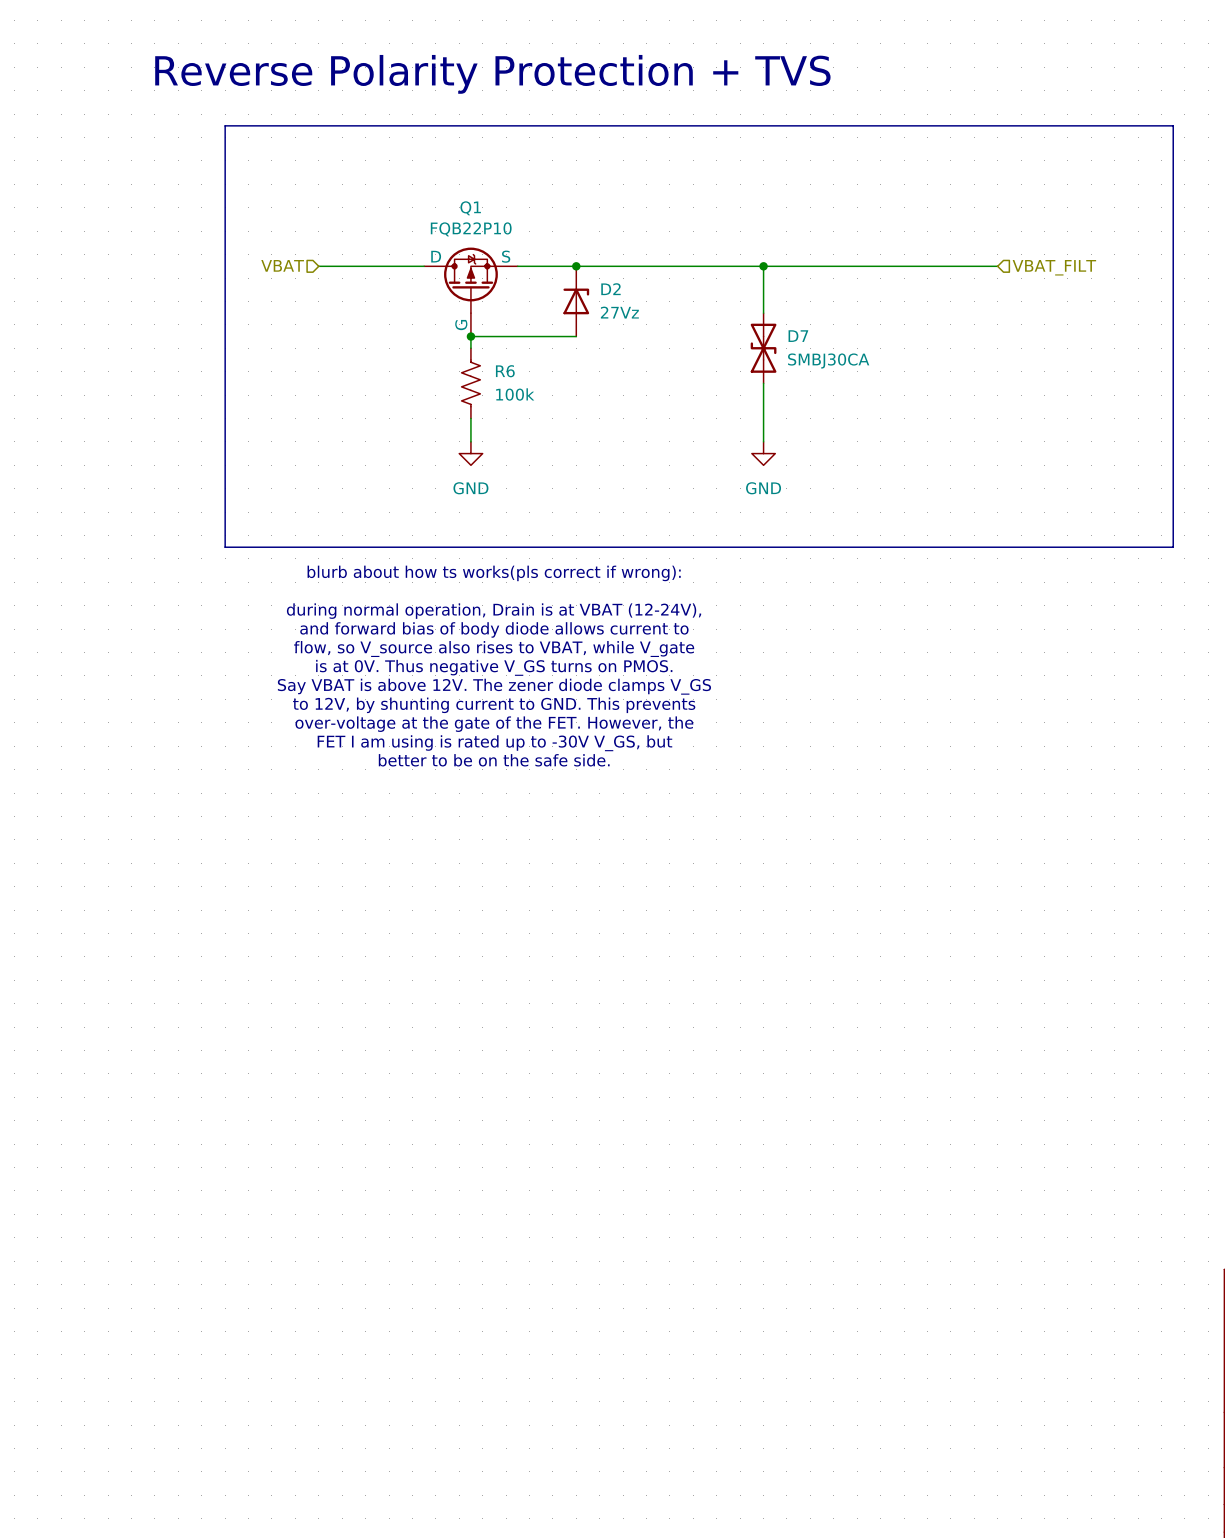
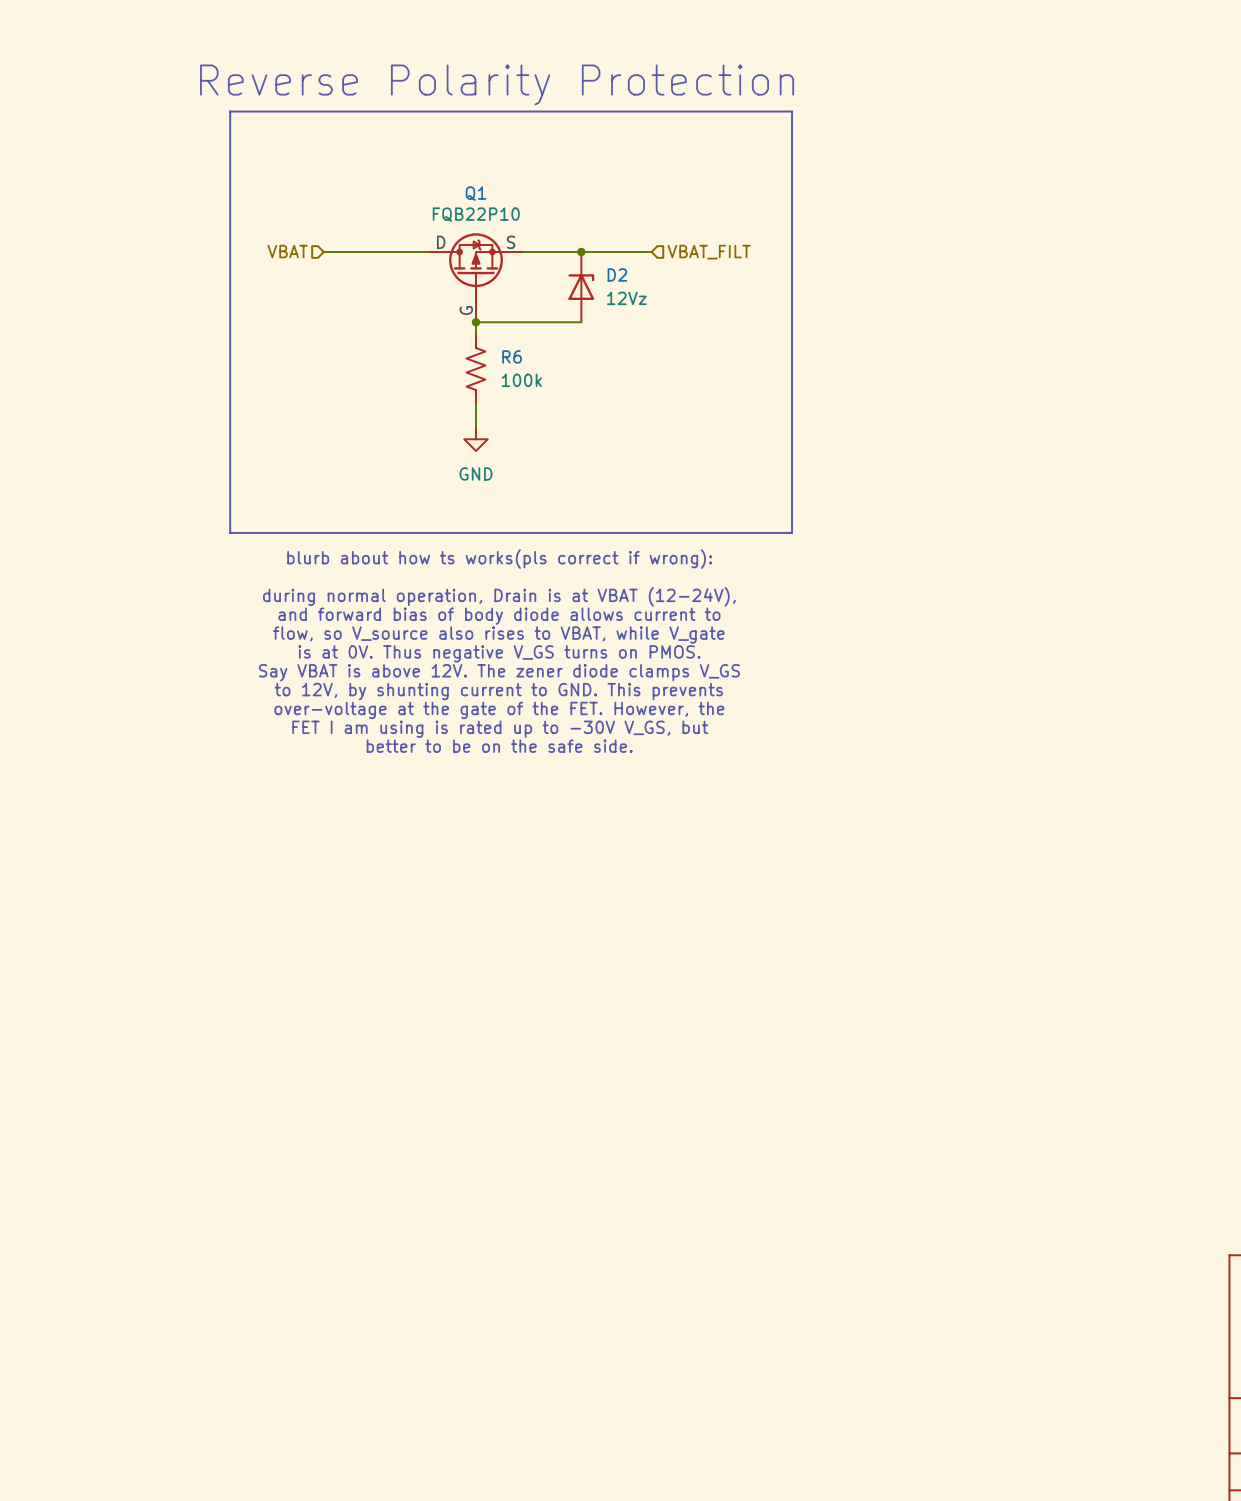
text: Reverse Polarity Protection + TVS (492, 74) -> Reverse Polarity Protection (497, 84)
line: (786, 125) (1173, 125) (1173, 547) (786, 547) -> (792, 111) (792, 532)
wire: (646, 266) (997, 266) -> none
wire: (763, 266) (763, 313) -> none
junction: (763, 266) -> none
hierarchical label: none -> VBAT_FILT (709, 252)
hierarchical label: VBAT_FILT (1054, 267) -> none
D2 value: 27Vz (619, 312) -> 12Vz (626, 298)
D7: SMBJ30CA (763, 348) -> none
wire: (763, 383) (763, 441) -> none
power symbol: GND (763, 453) -> none

